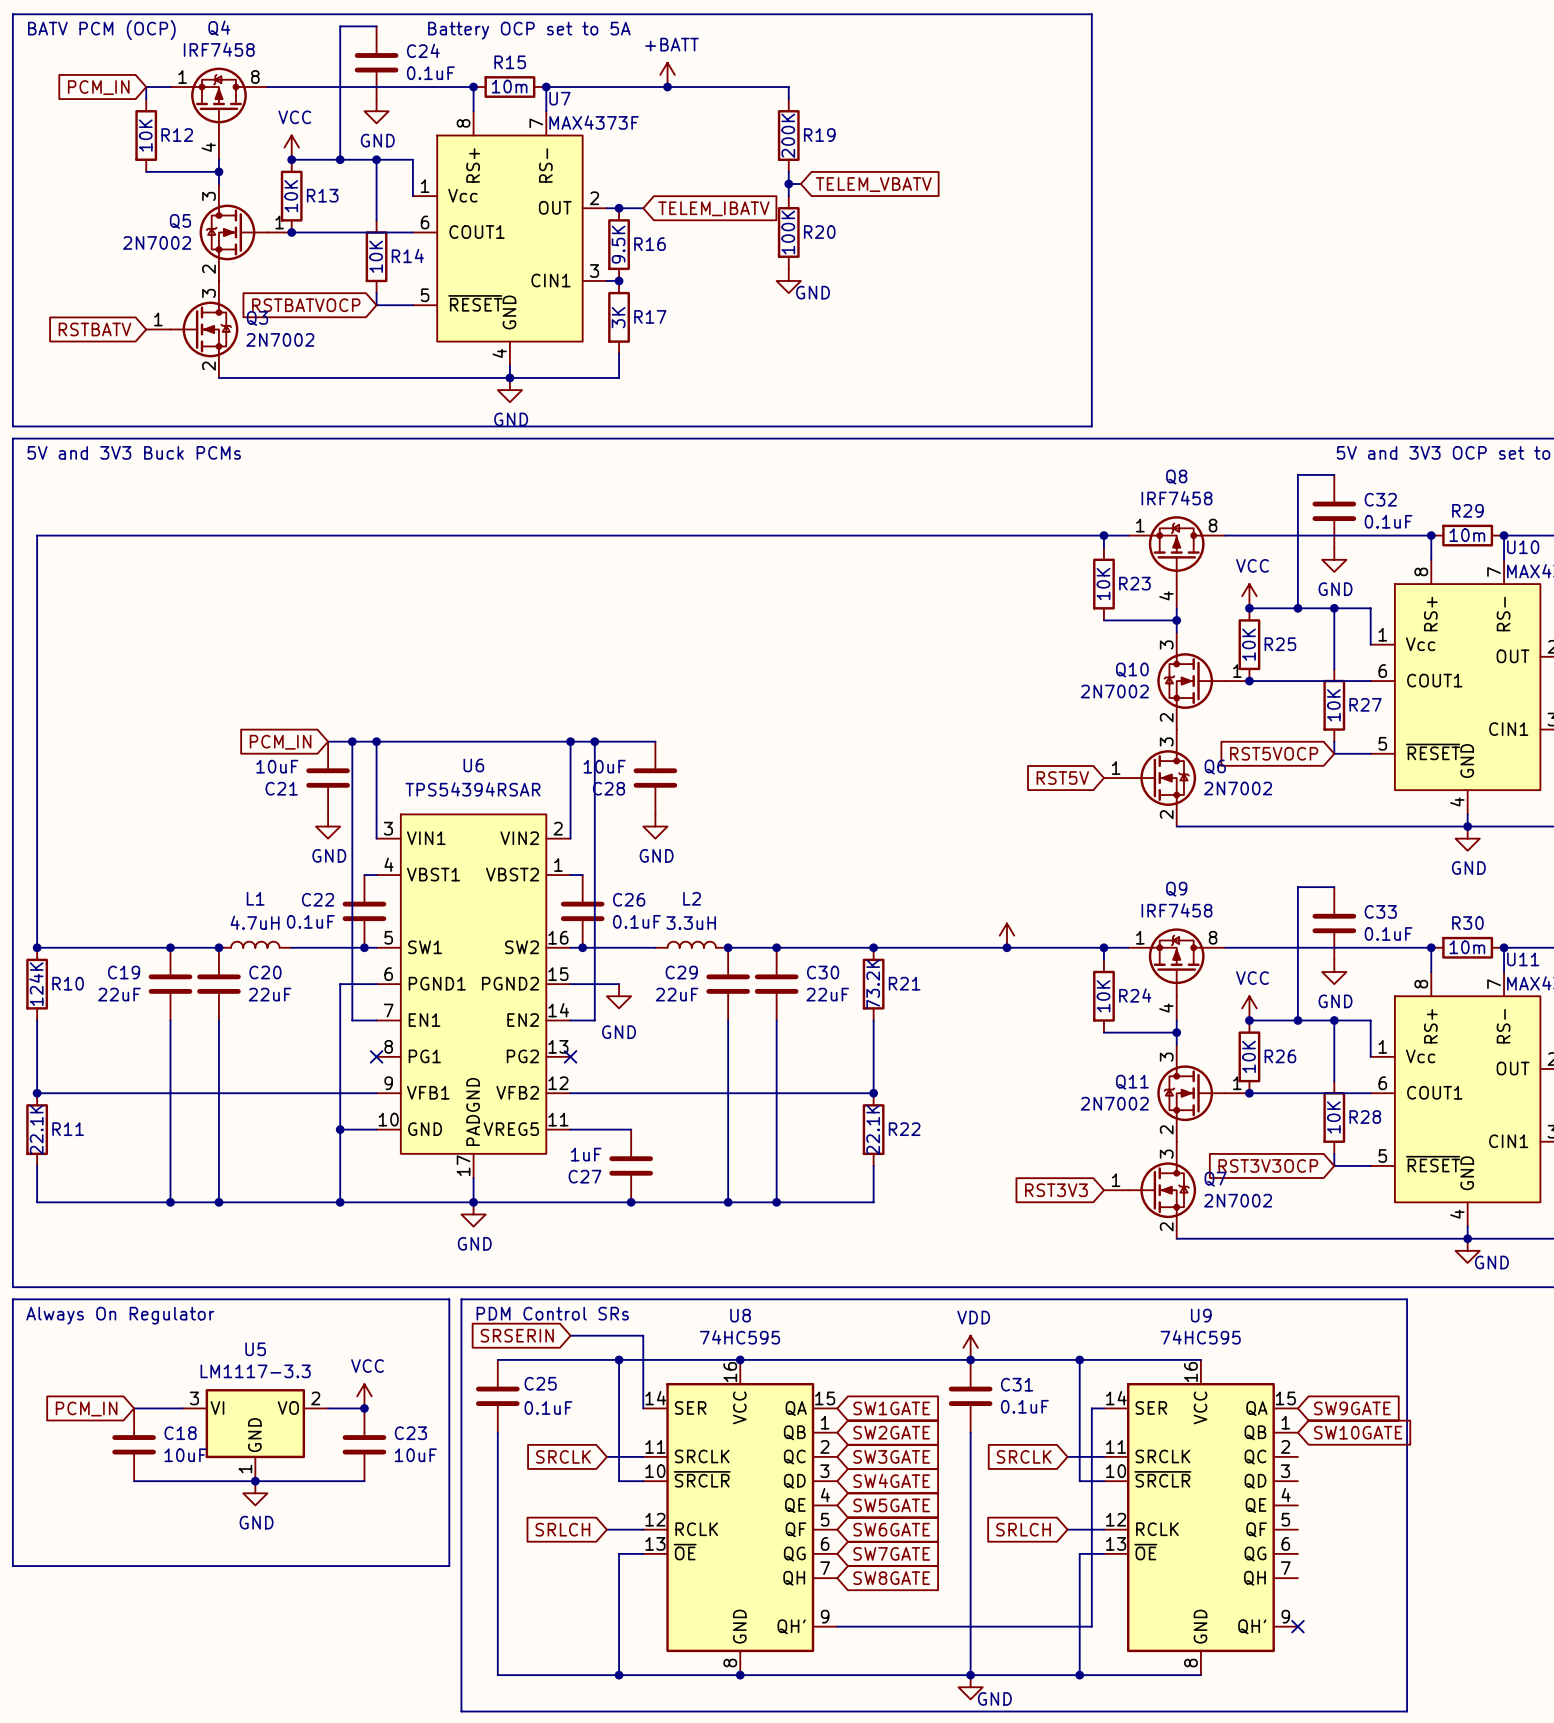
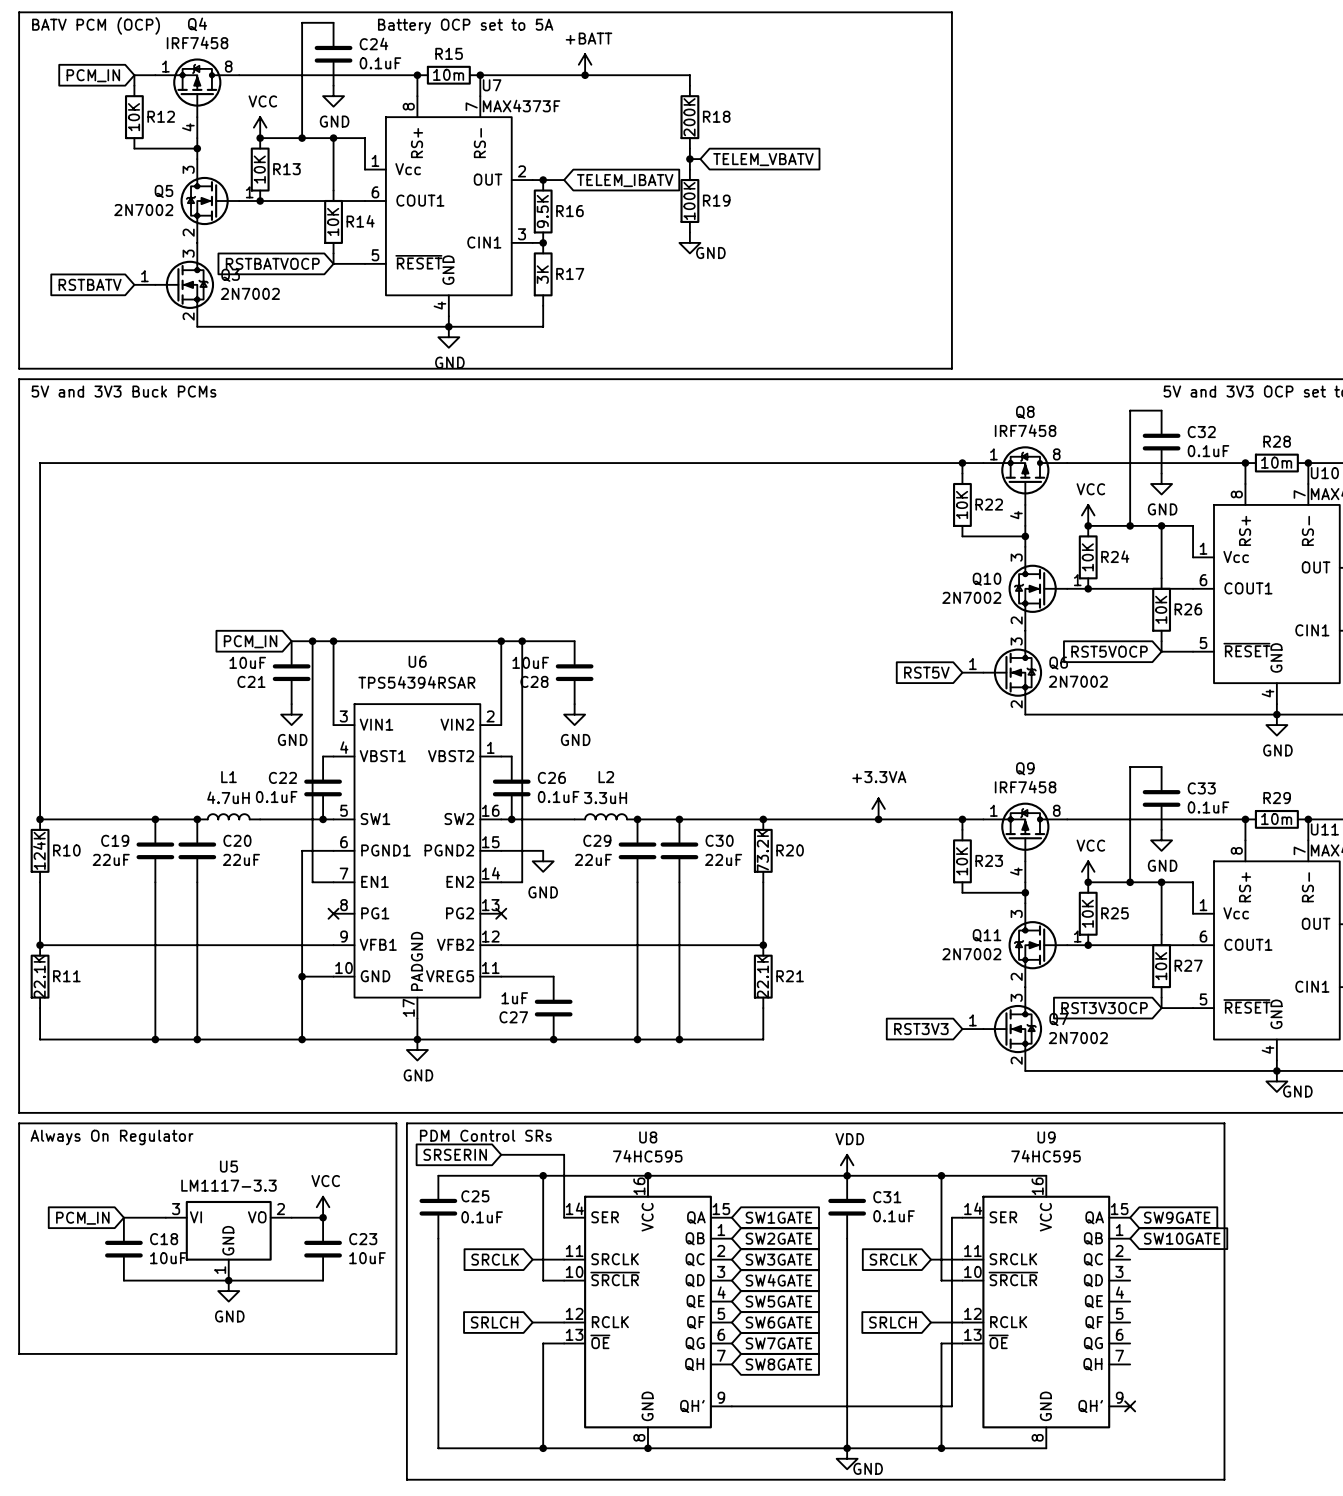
R19 name: R19 (819, 135) -> R18 (716, 116)
R20 name: R20 (819, 232) -> R19 (716, 200)
R29 name: R29 (1467, 510) -> R28 (1277, 441)
R23 name: R23 (1134, 583) -> R22 (989, 504)
R25 name: R25 (1280, 644) -> R24 (1115, 556)
R27 name: R27 (1365, 704) -> R26 (1188, 609)
power symbol text: none -> +3.3VA (879, 777)
R30 name: R30 (1467, 923) -> R29 (1277, 798)
R21 name: R21 (904, 983) -> R20 (790, 850)
R24 name: R24 (1135, 995) -> R23 (989, 860)
R26 name: R26 (1280, 1056) -> R25 (1115, 913)
R28 name: R28 (1365, 1117) -> R27 (1188, 965)
R22 name: R22 (904, 1129) -> R21 (790, 976)

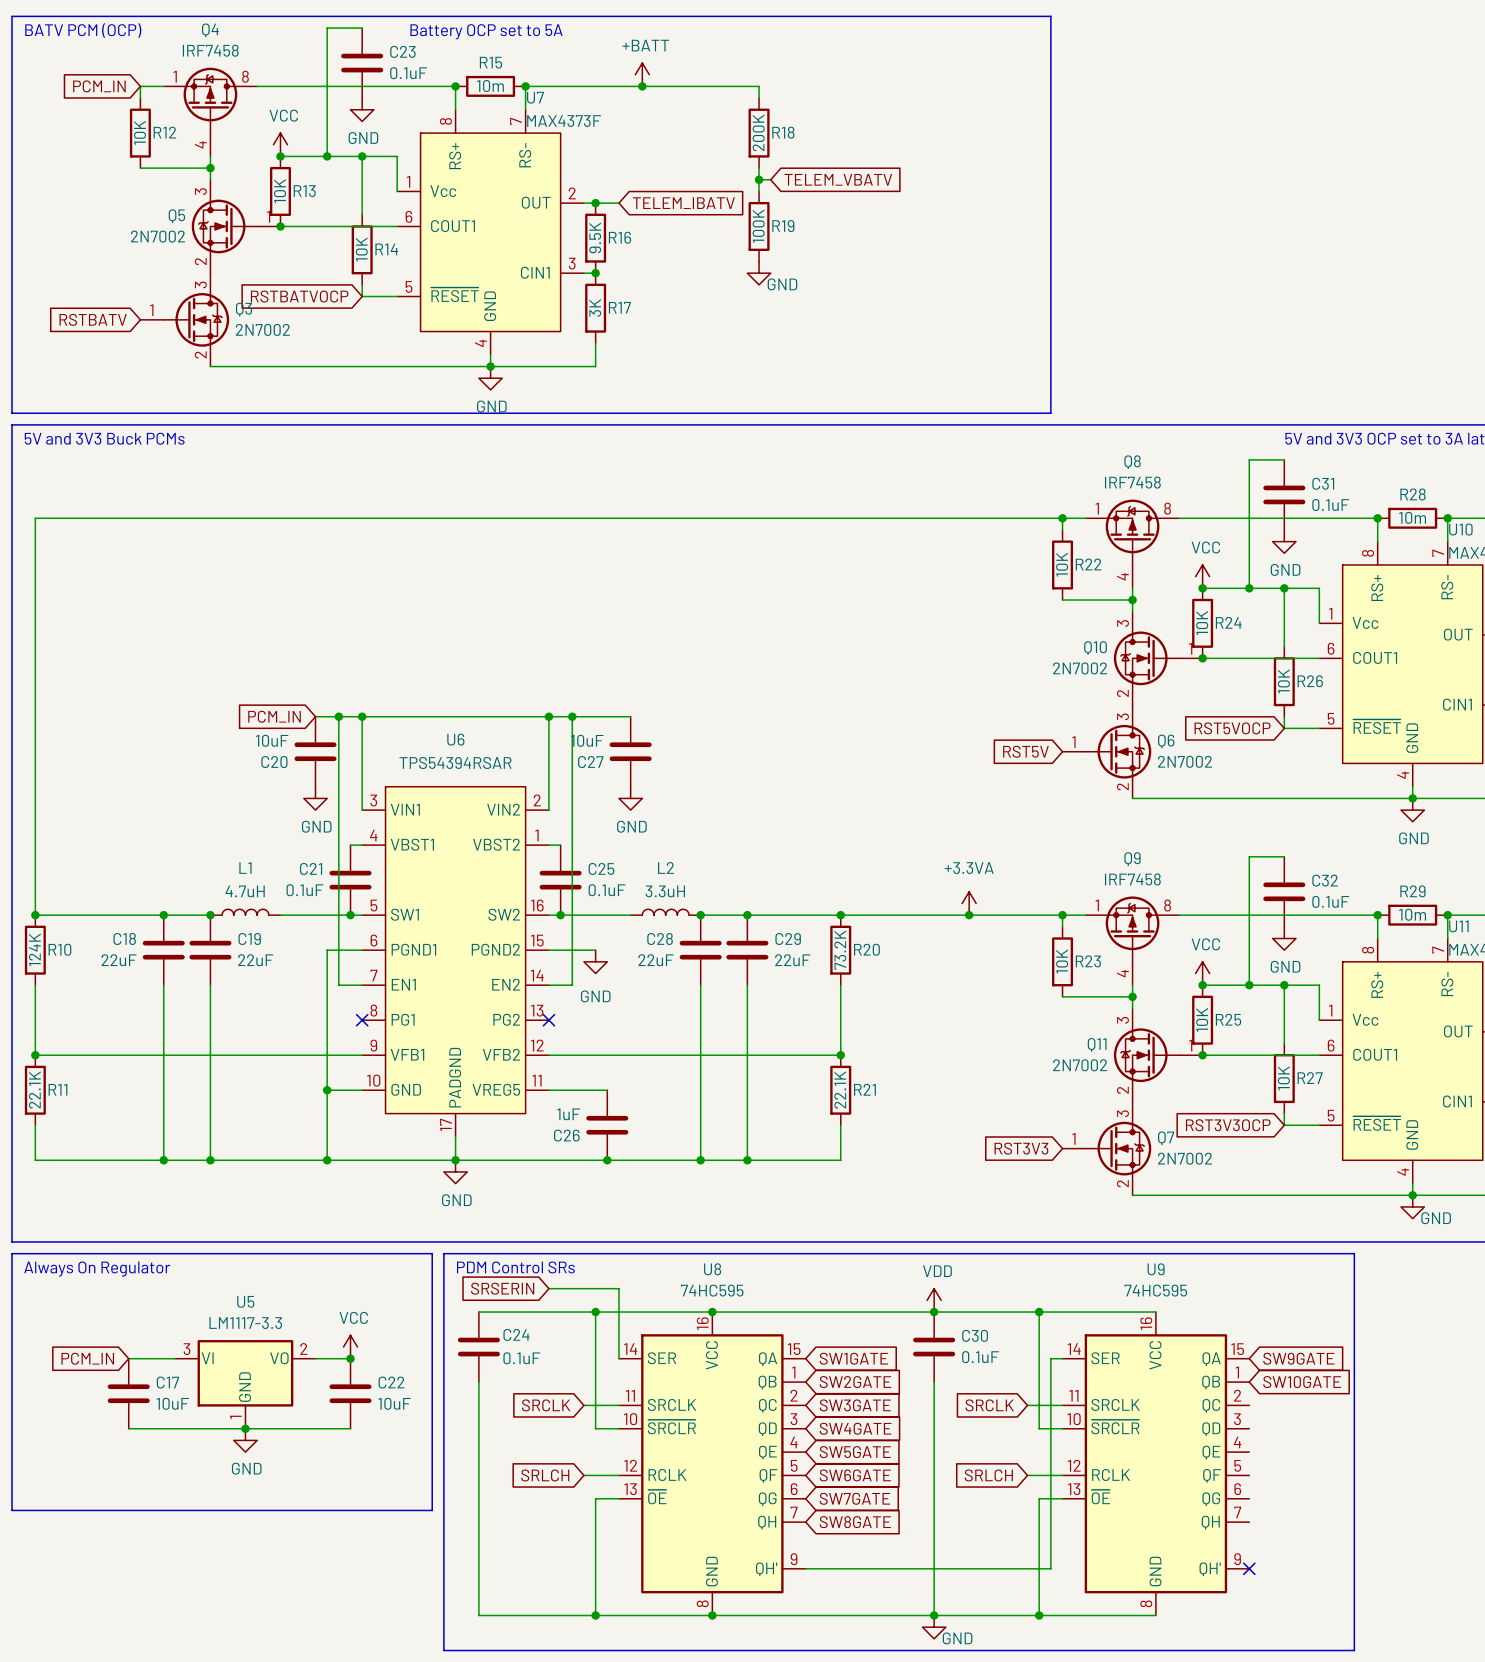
C24 name: C24 (373, 43) -> C23 (402, 51)
C32 name: C32 (1201, 432) -> C31 (1323, 483)
C21 name: C21 (251, 681) -> C20 (274, 762)
C28 name: C28 (534, 681) -> C27 (590, 762)
C22 name: C22 (282, 777) -> C21 (311, 868)
C26 name: C26 (551, 777) -> C25 (601, 868)
C33 name: C33 (1201, 788) -> C32 (1325, 880)
C19 name: C19 (115, 840) -> C18 (124, 938)
C20 name: C20 (237, 840) -> C19 (249, 939)
C29 name: C29 (597, 840) -> C28 (660, 938)
C30 name: C30 (719, 840) -> C29 (788, 939)
C27 name: C27 (513, 1017) -> C26 (566, 1135)
C25 name: C25 (475, 1196) -> C24 (516, 1334)
C31 name: C31 (887, 1197) -> C30 (975, 1335)
C18 name: C18 (164, 1239) -> C17 (167, 1382)
C23 name: C23 (363, 1239) -> C22 (391, 1382)

